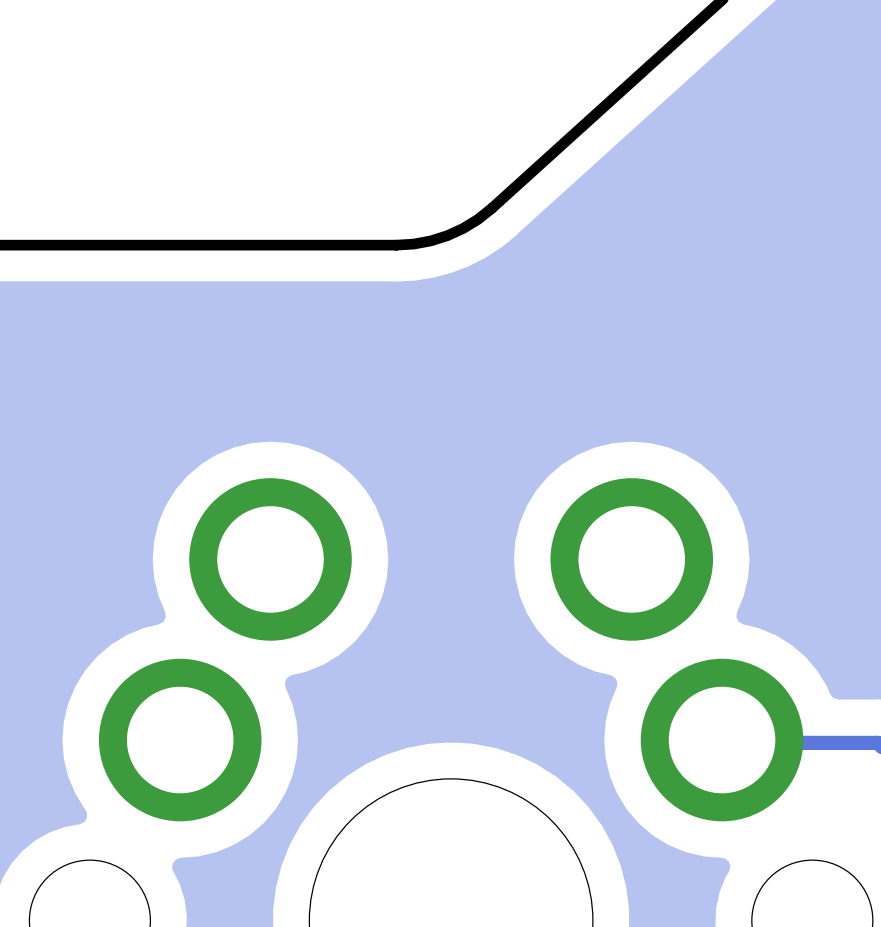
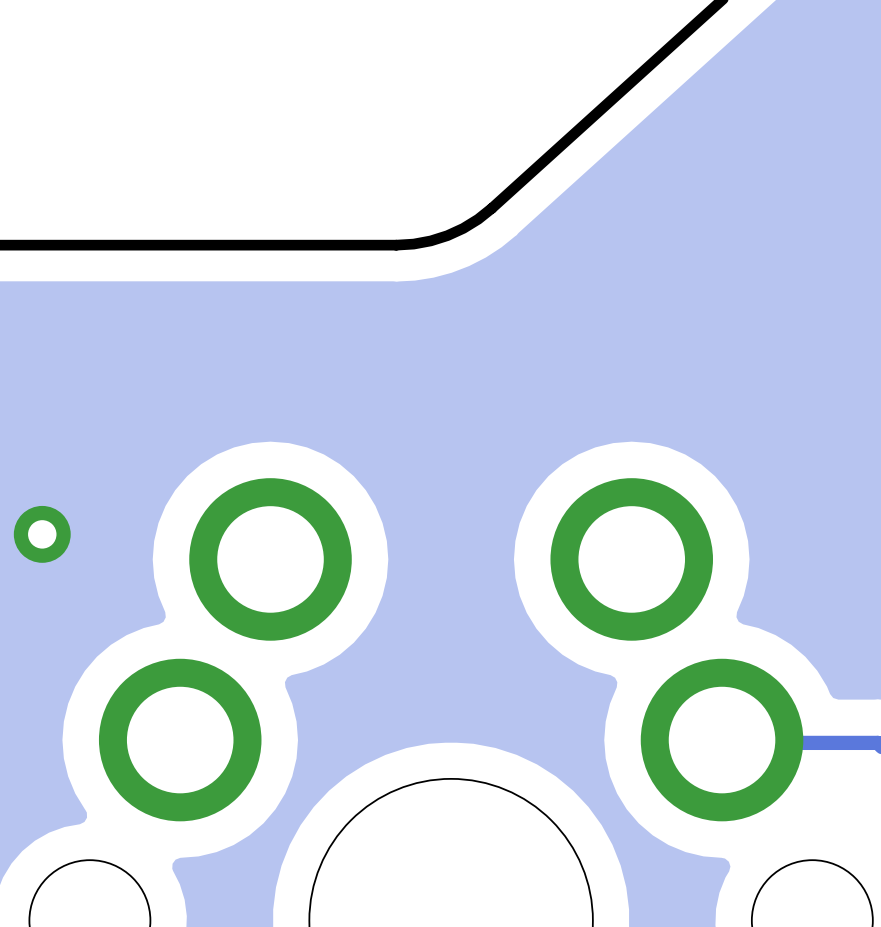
via: none -> (42, 534)

